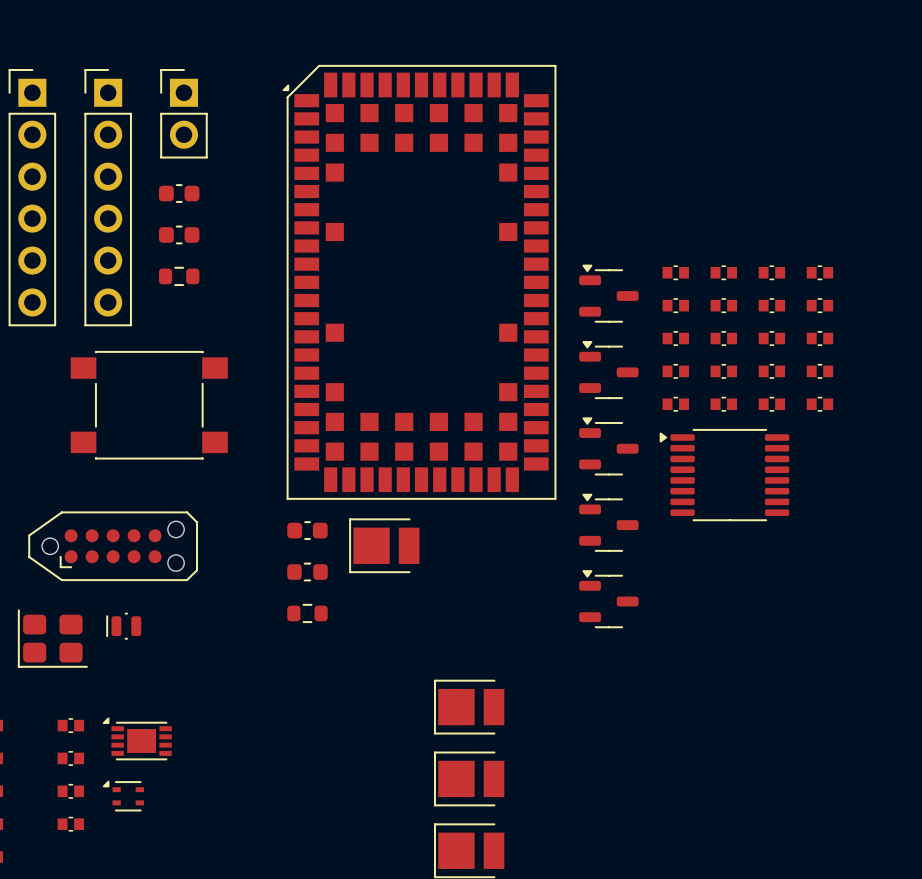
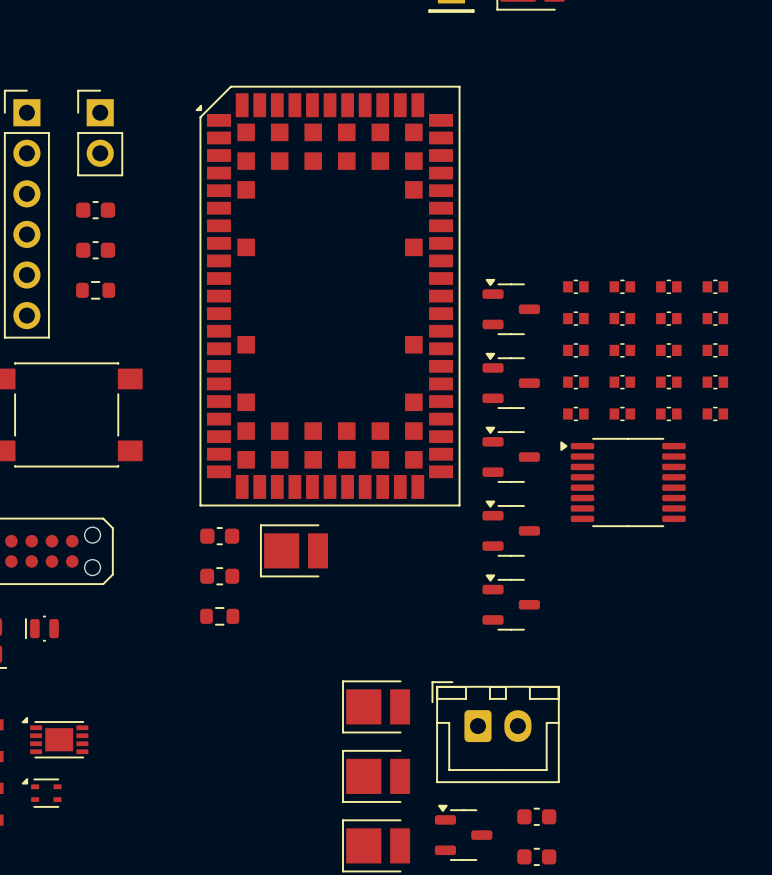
part: none -> (495, 732)
part: none -> (536, 816)
part: none -> (463, 832)
part: none -> (536, 856)

